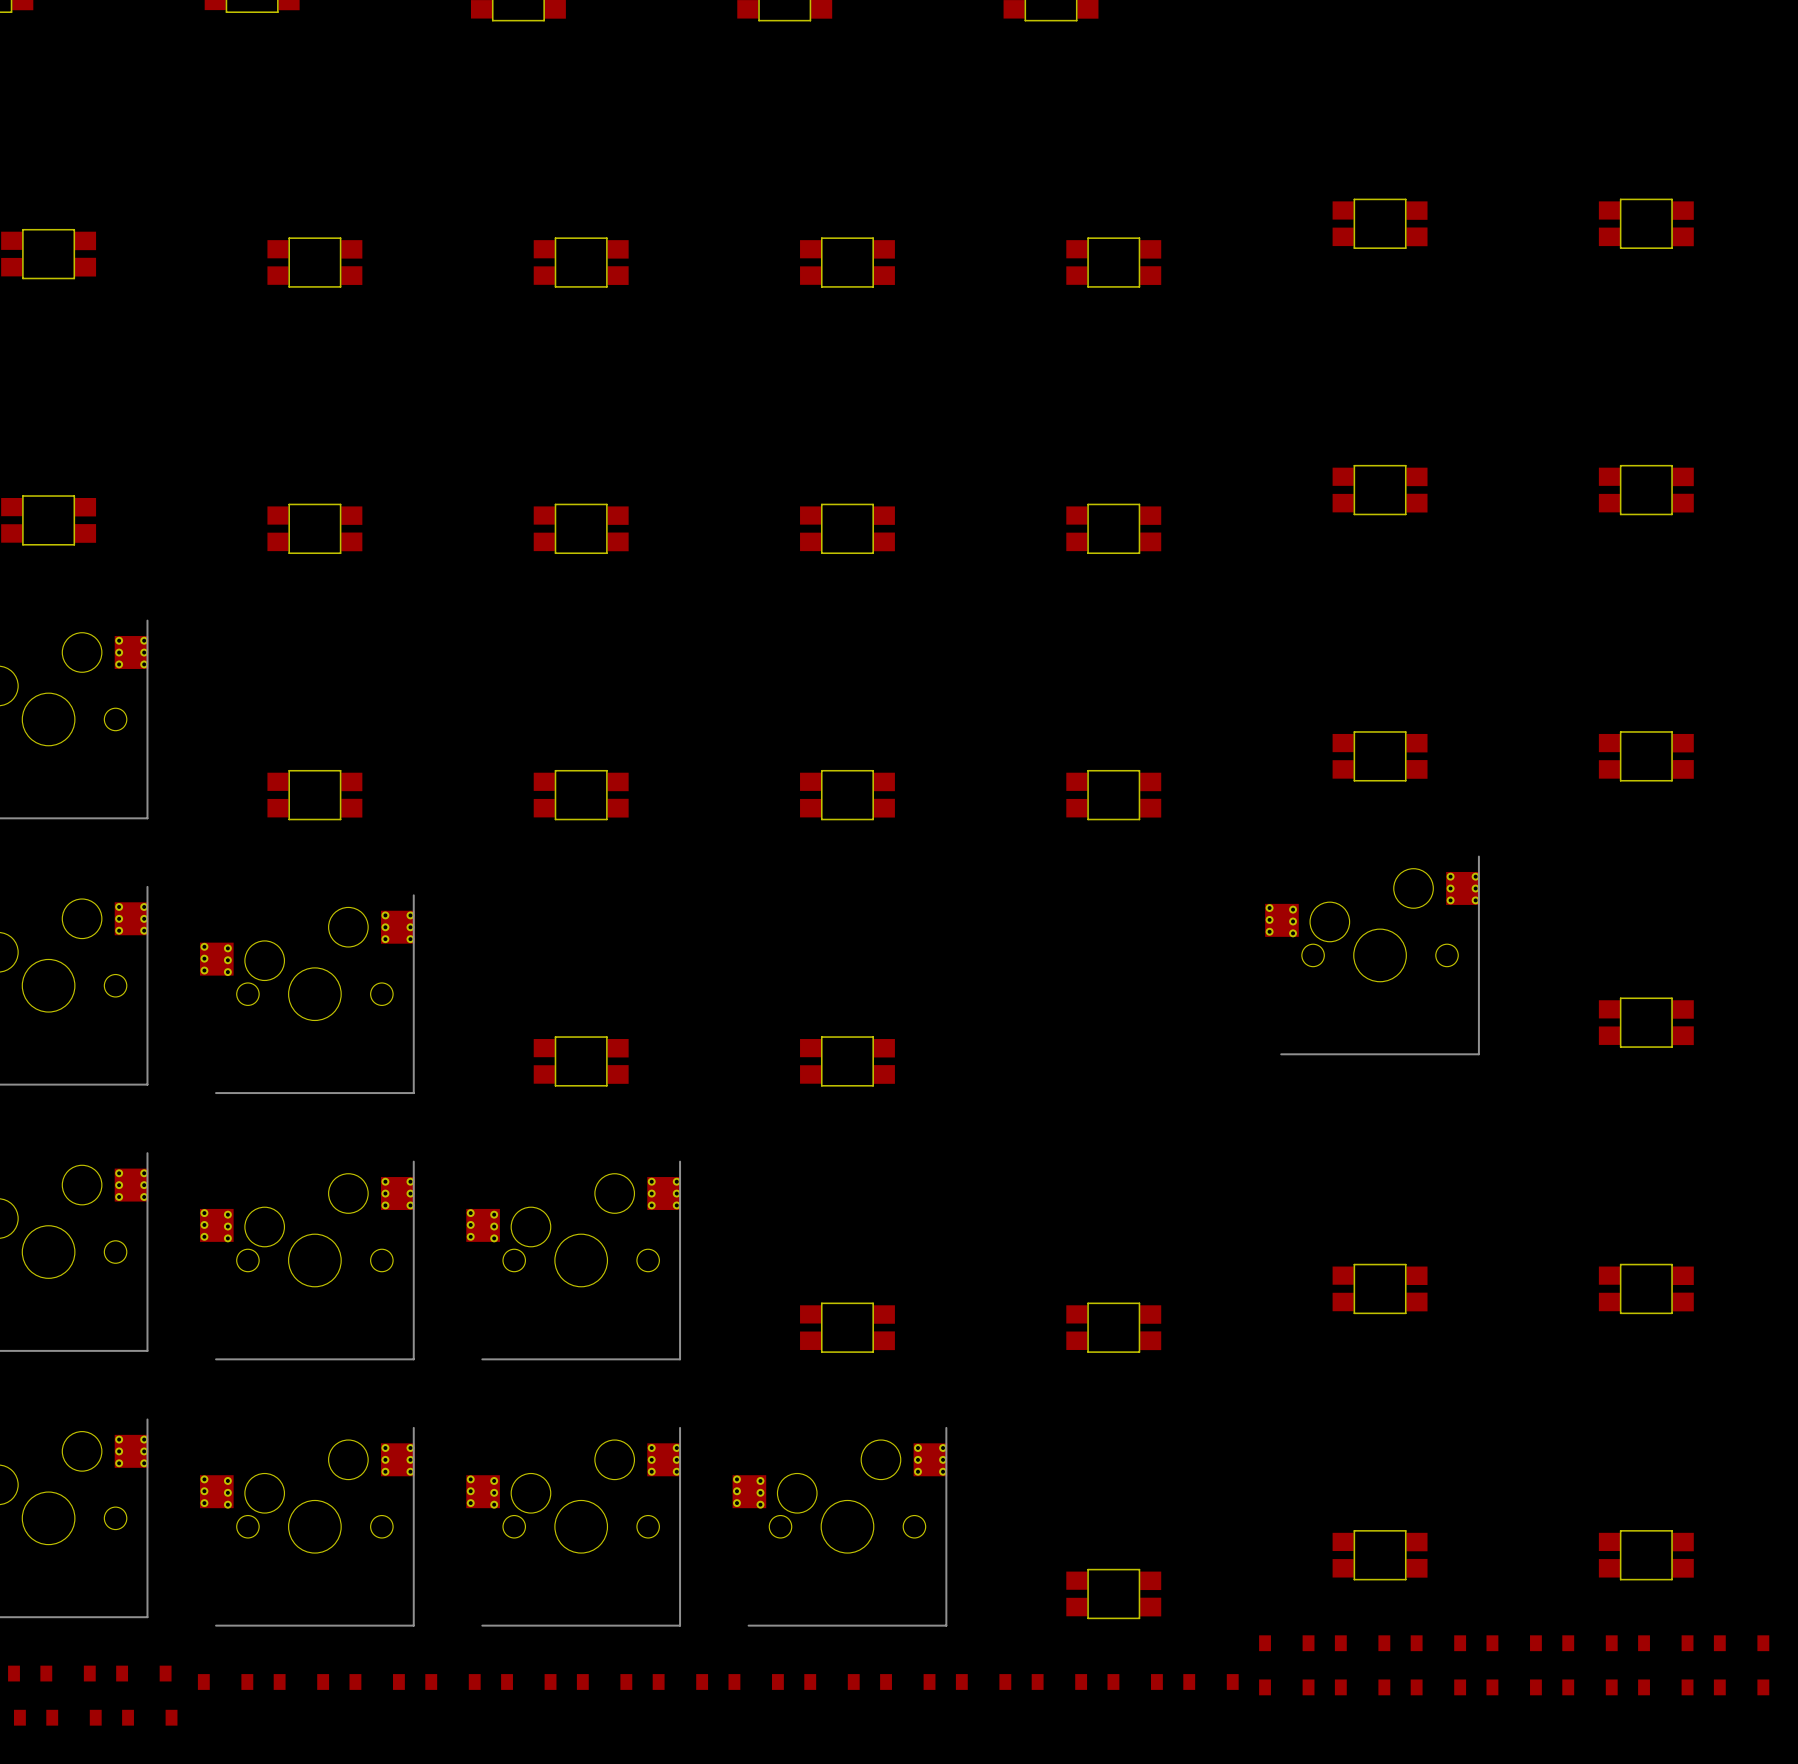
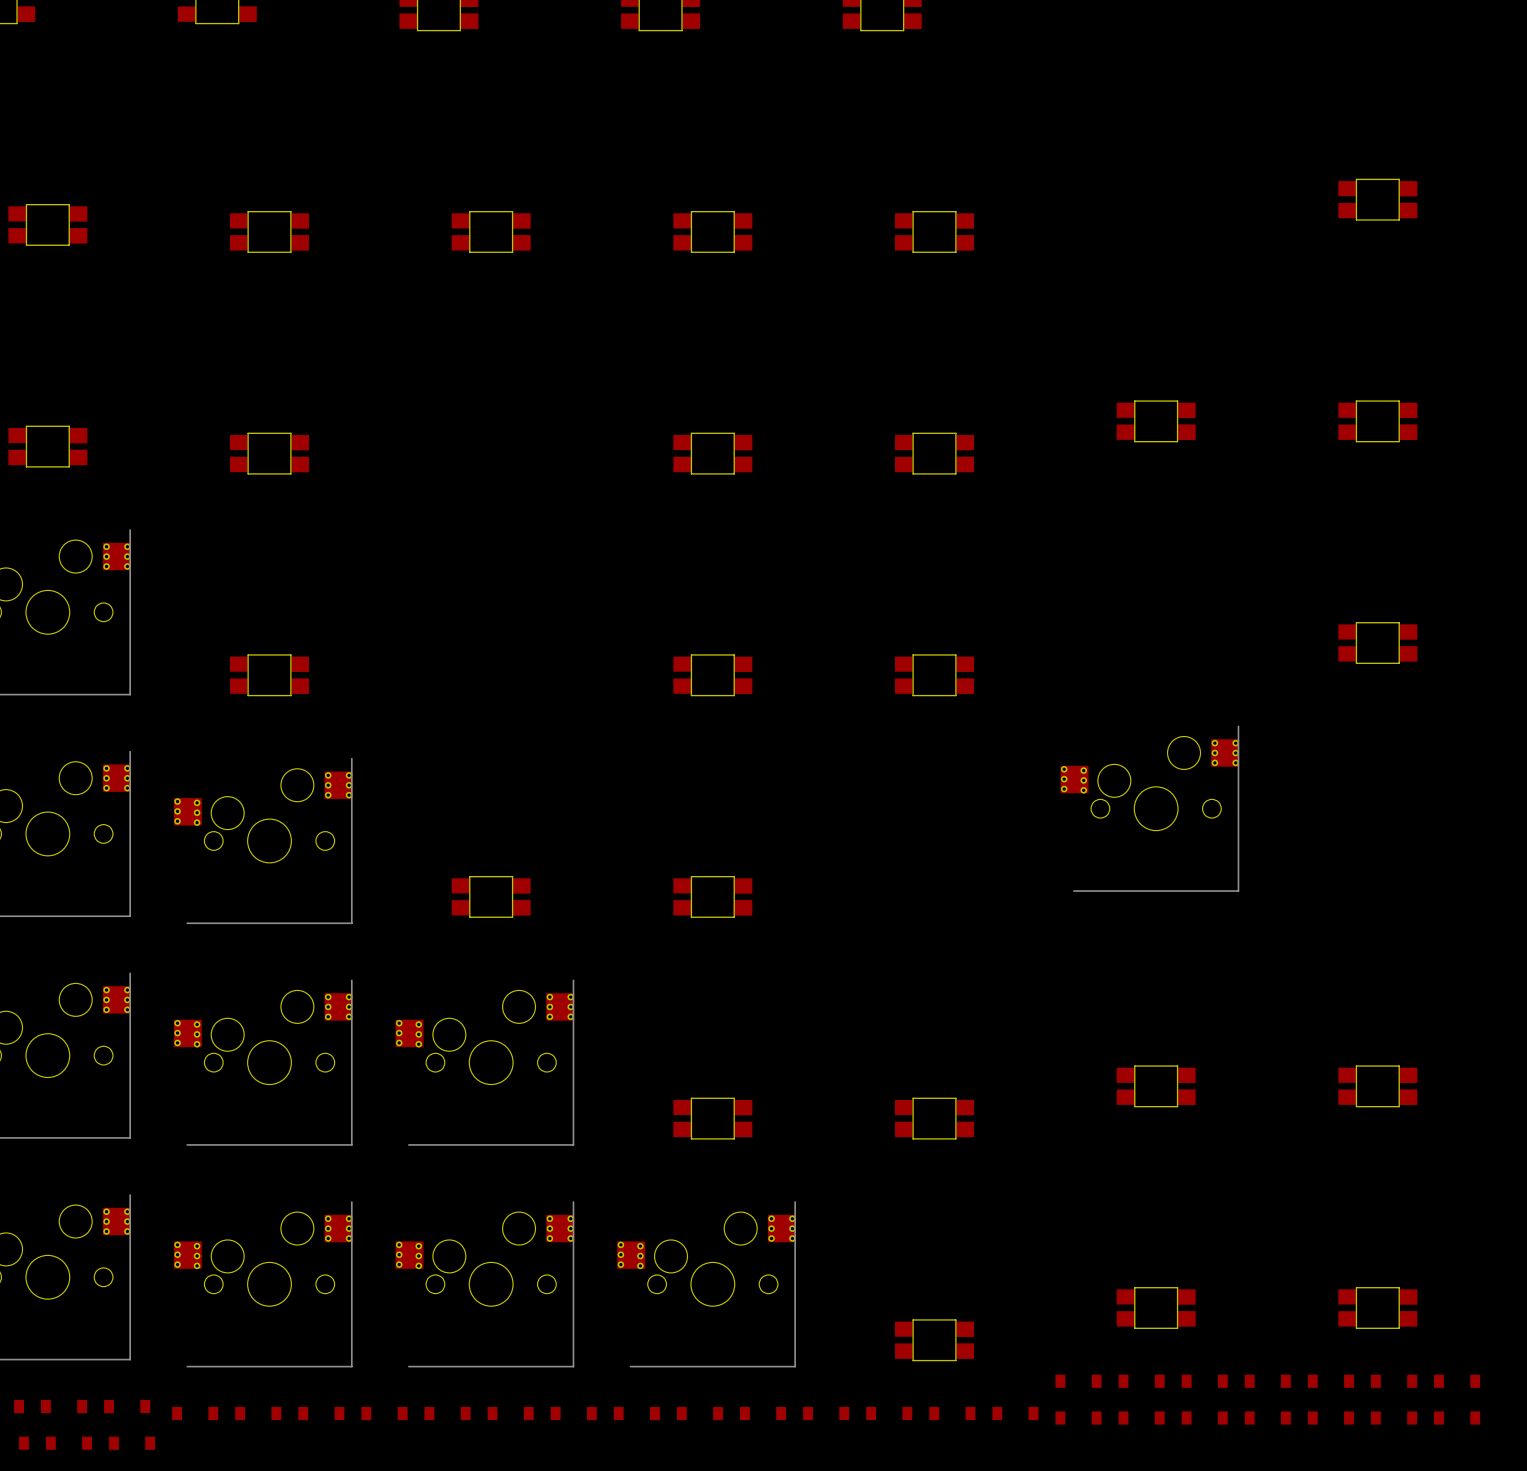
part: (1380, 223) -> none
part: (581, 528) -> none
part: (1380, 756) -> none
part: (581, 795) -> none
part: (1646, 1022) -> none

